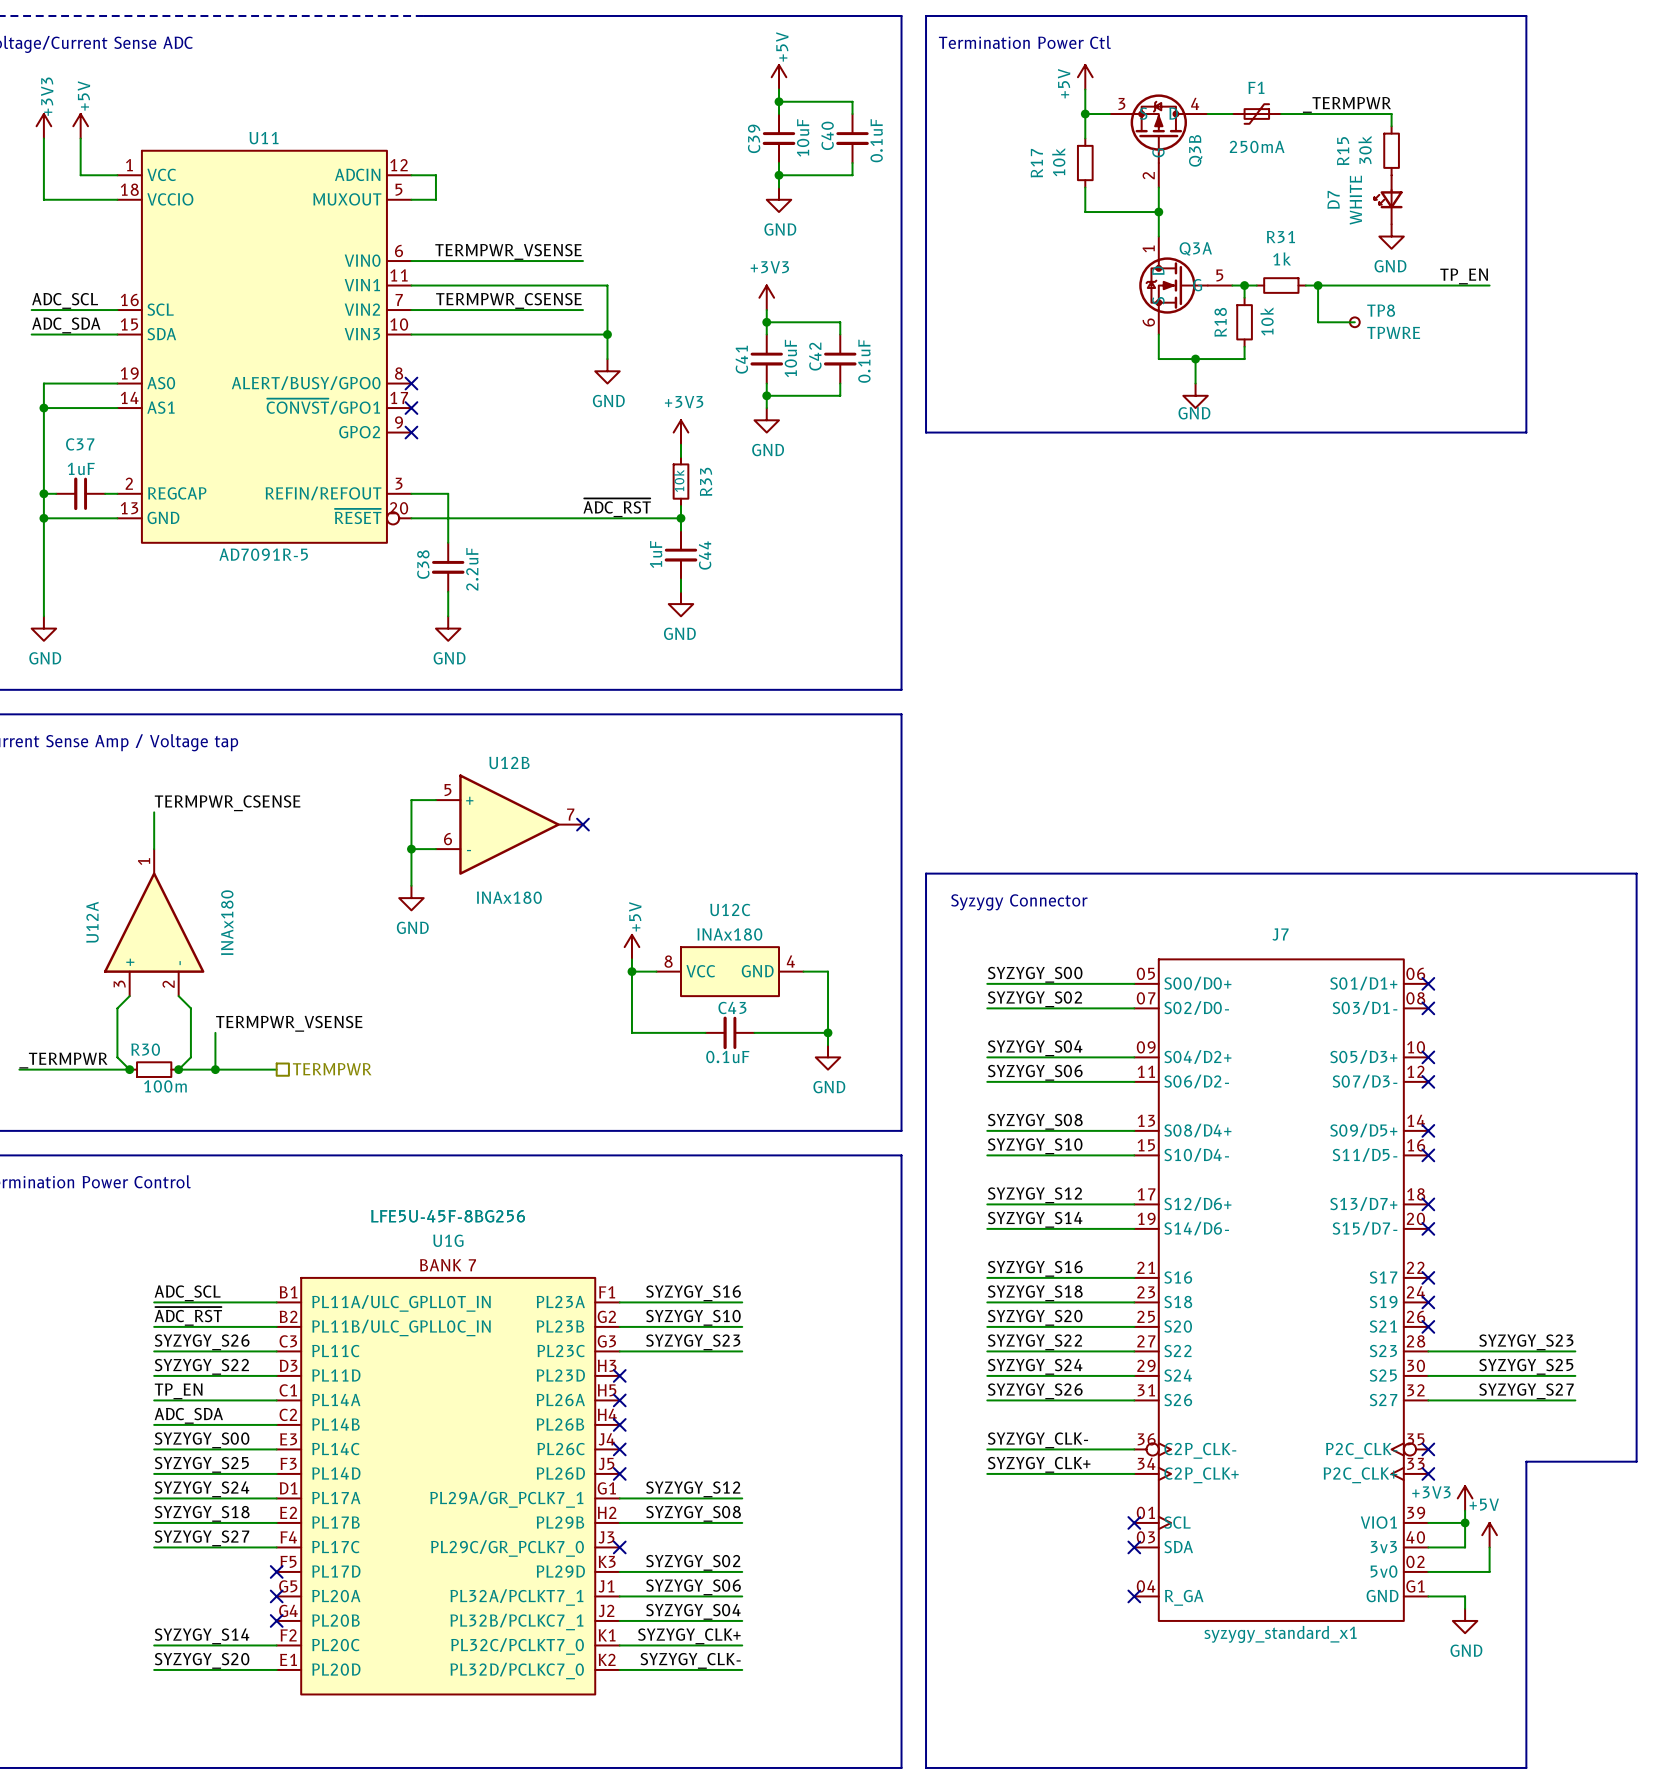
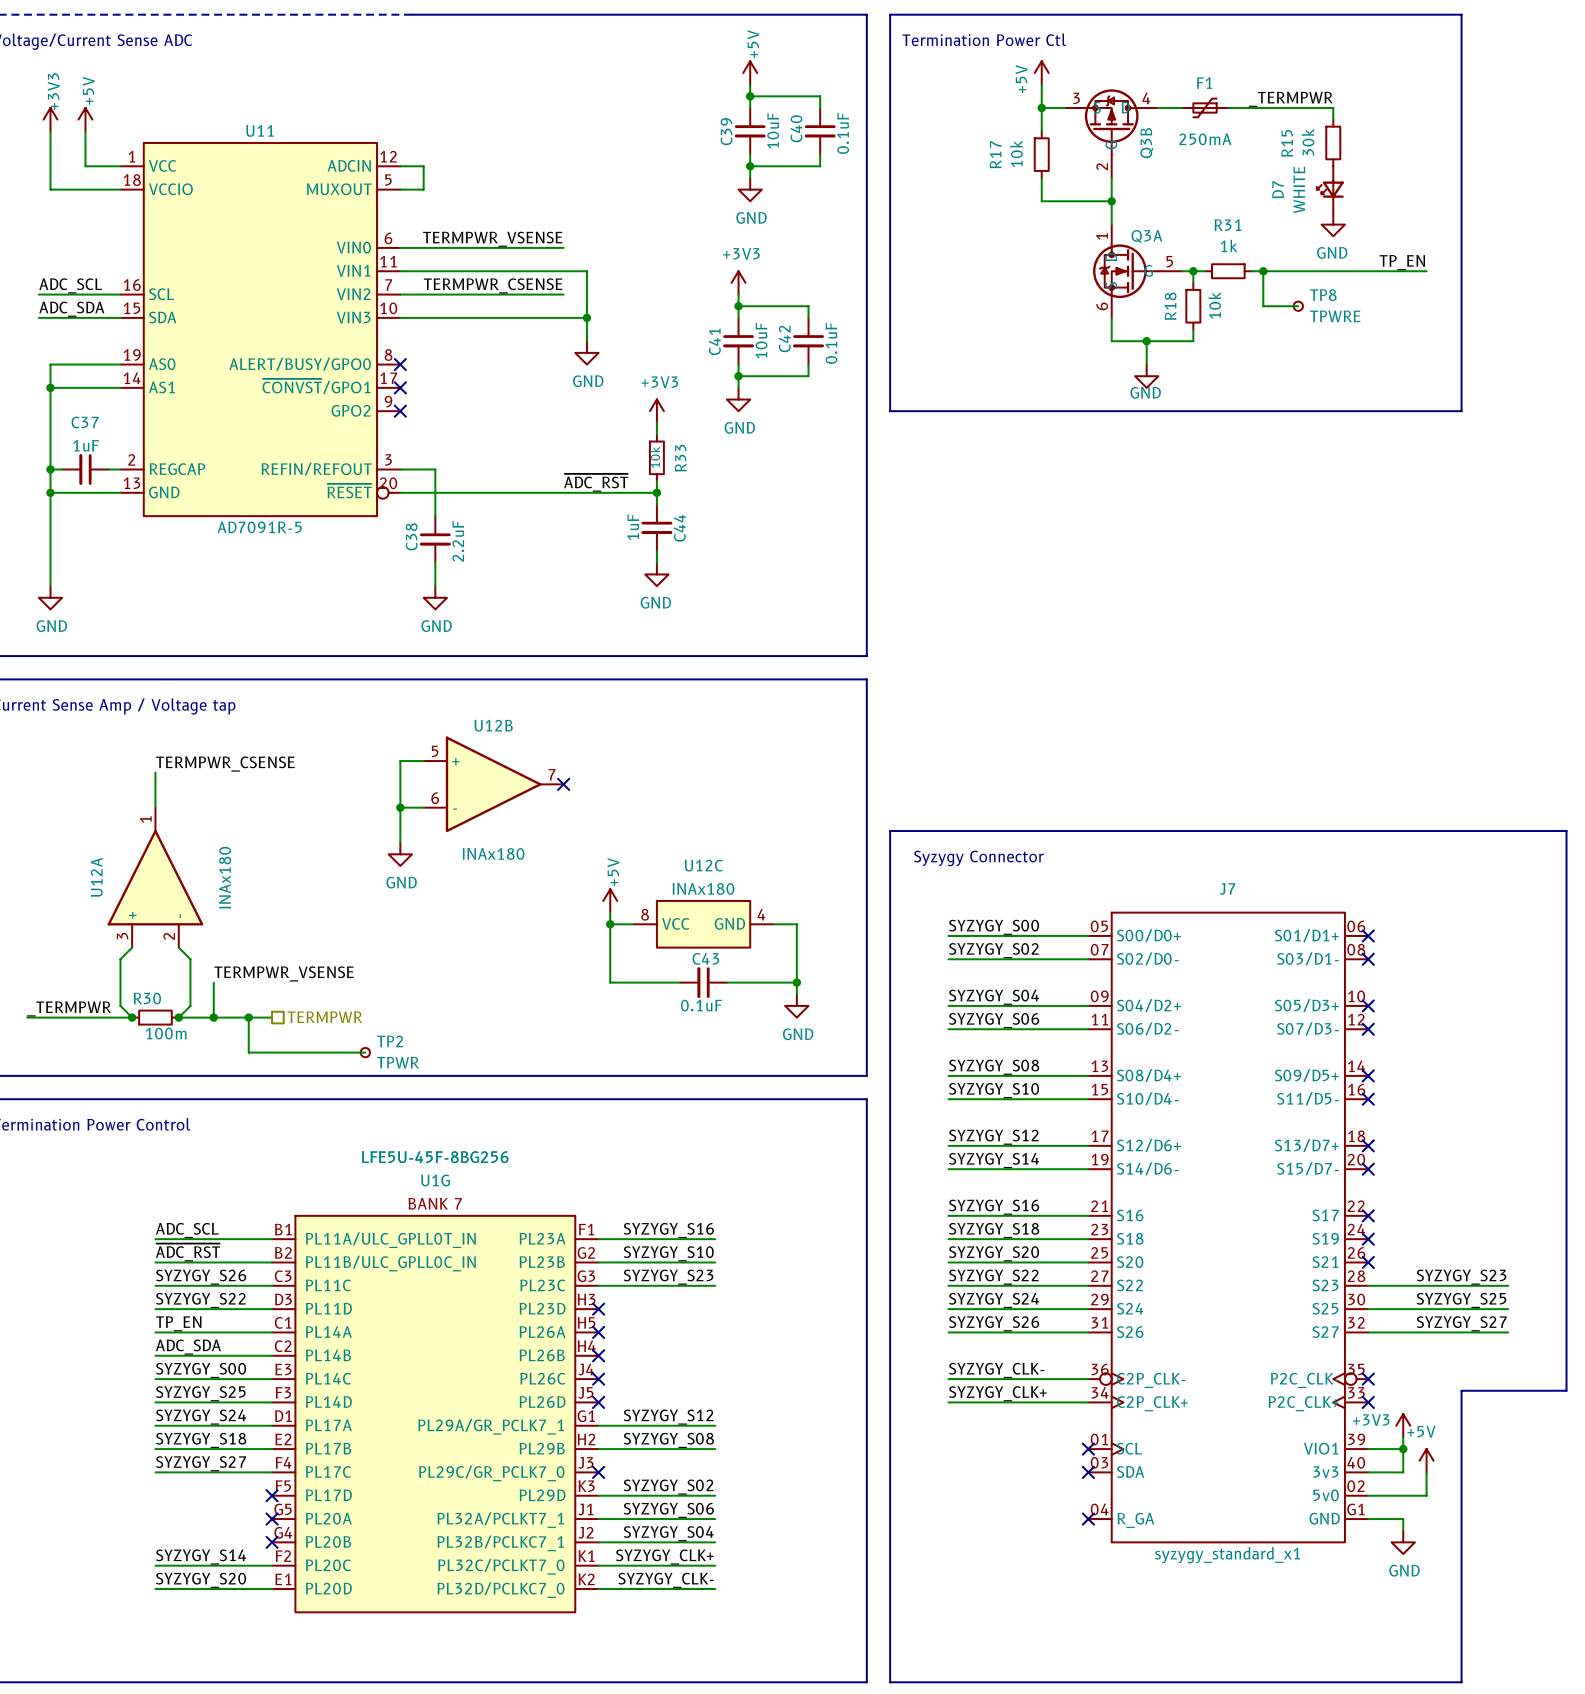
wire: none -> (248, 1017) (248, 1052) (365, 1052)
junction: none -> (248, 1017)
TP2: none -> TPWR (365, 1052)

